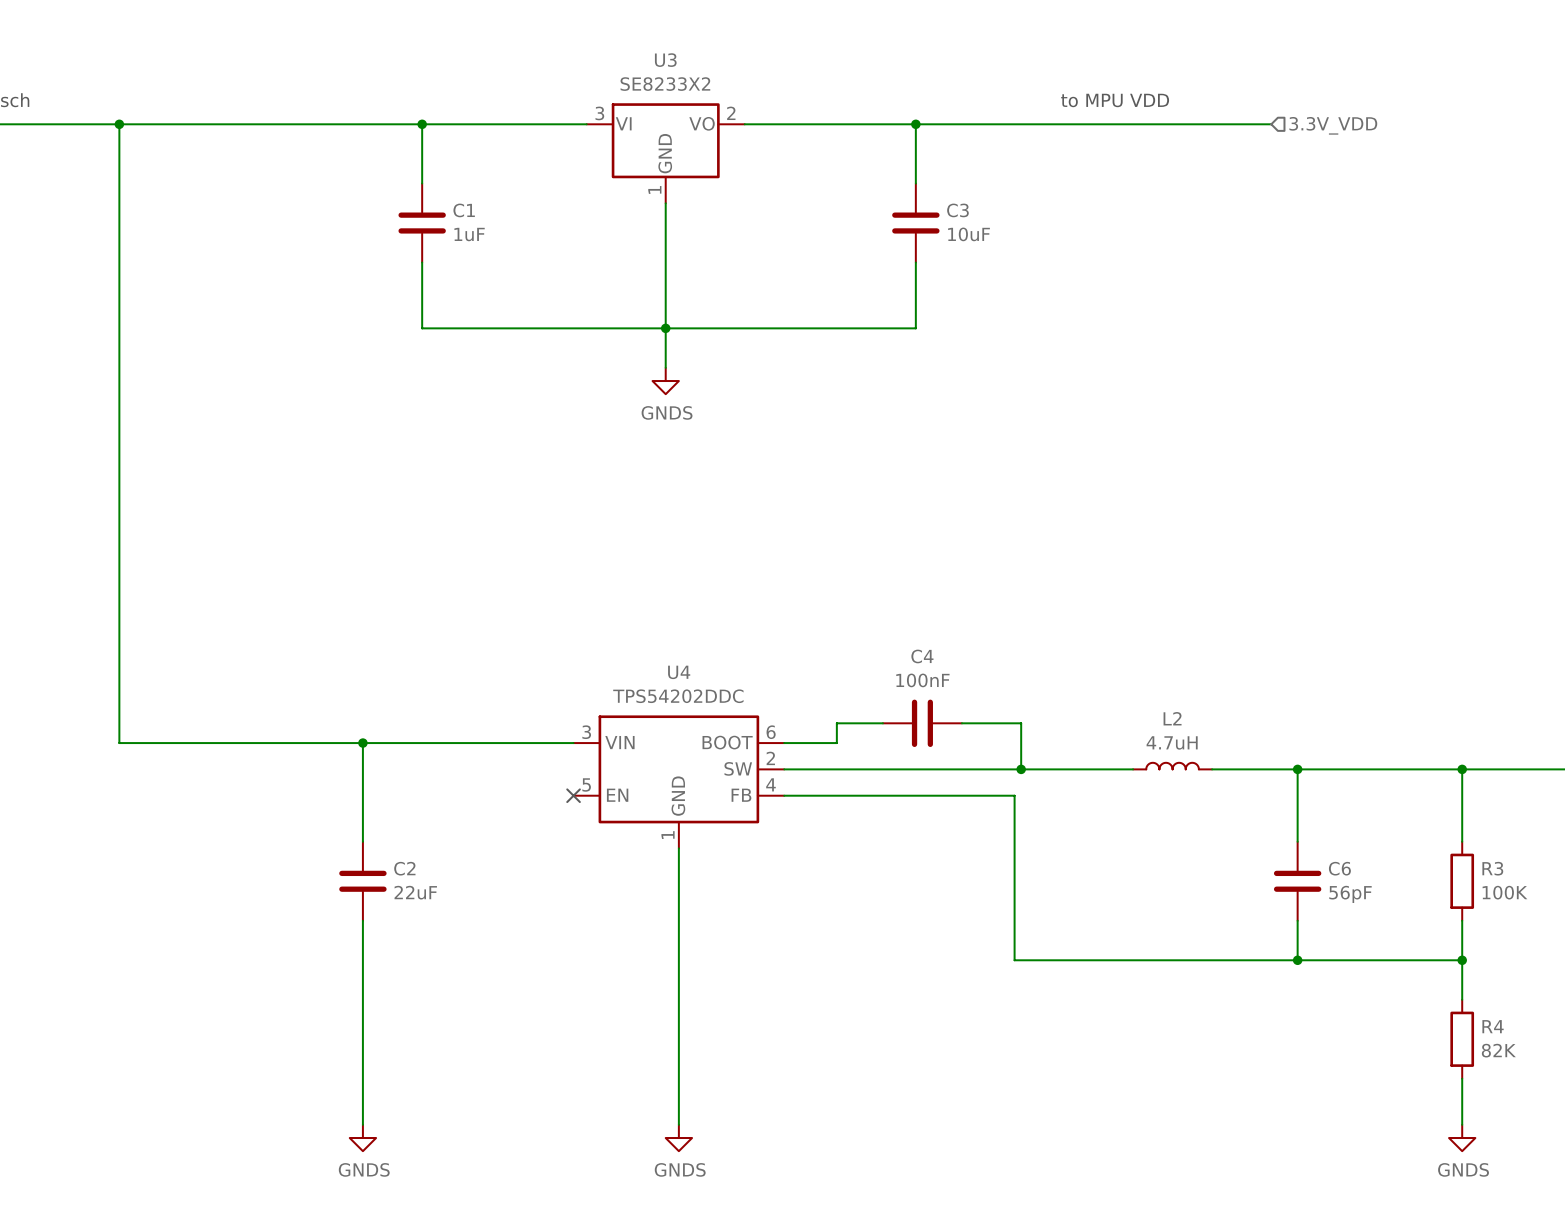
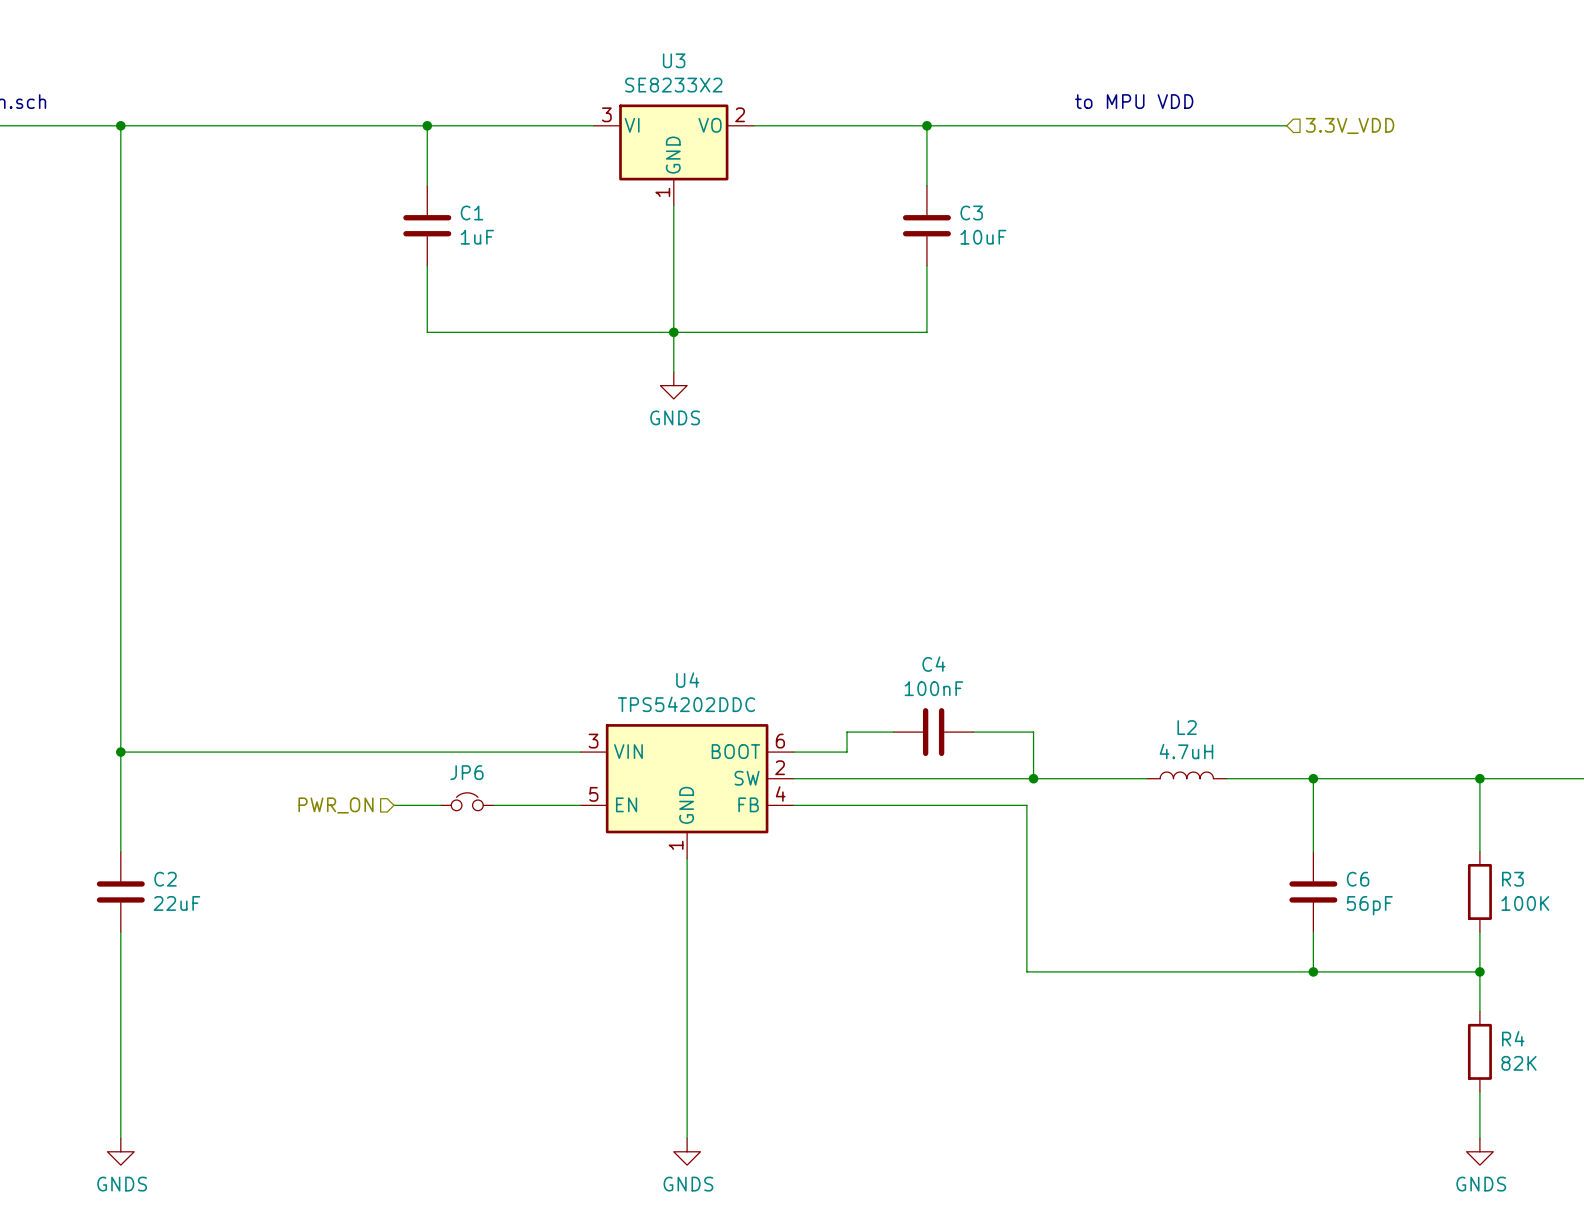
junction: none -> (120, 752)
wire: (362, 743) (362, 841) -> (120, 752) (120, 852)
junction: (362, 743) -> none
JP6: none -> (467, 801)
wire: none -> (393, 805) (440, 805)
wire: none -> (493, 805) (580, 805)
no-connect mark: (573, 795) -> none
hierarchical label: none -> PWR_ON (336, 805)
C2 position: (362, 881) -> (120, 891)
wire: (362, 920) (362, 1124) -> (120, 931) (120, 1138)
power symbol position: GNDS (362, 1138) -> GNDS (120, 1151)

